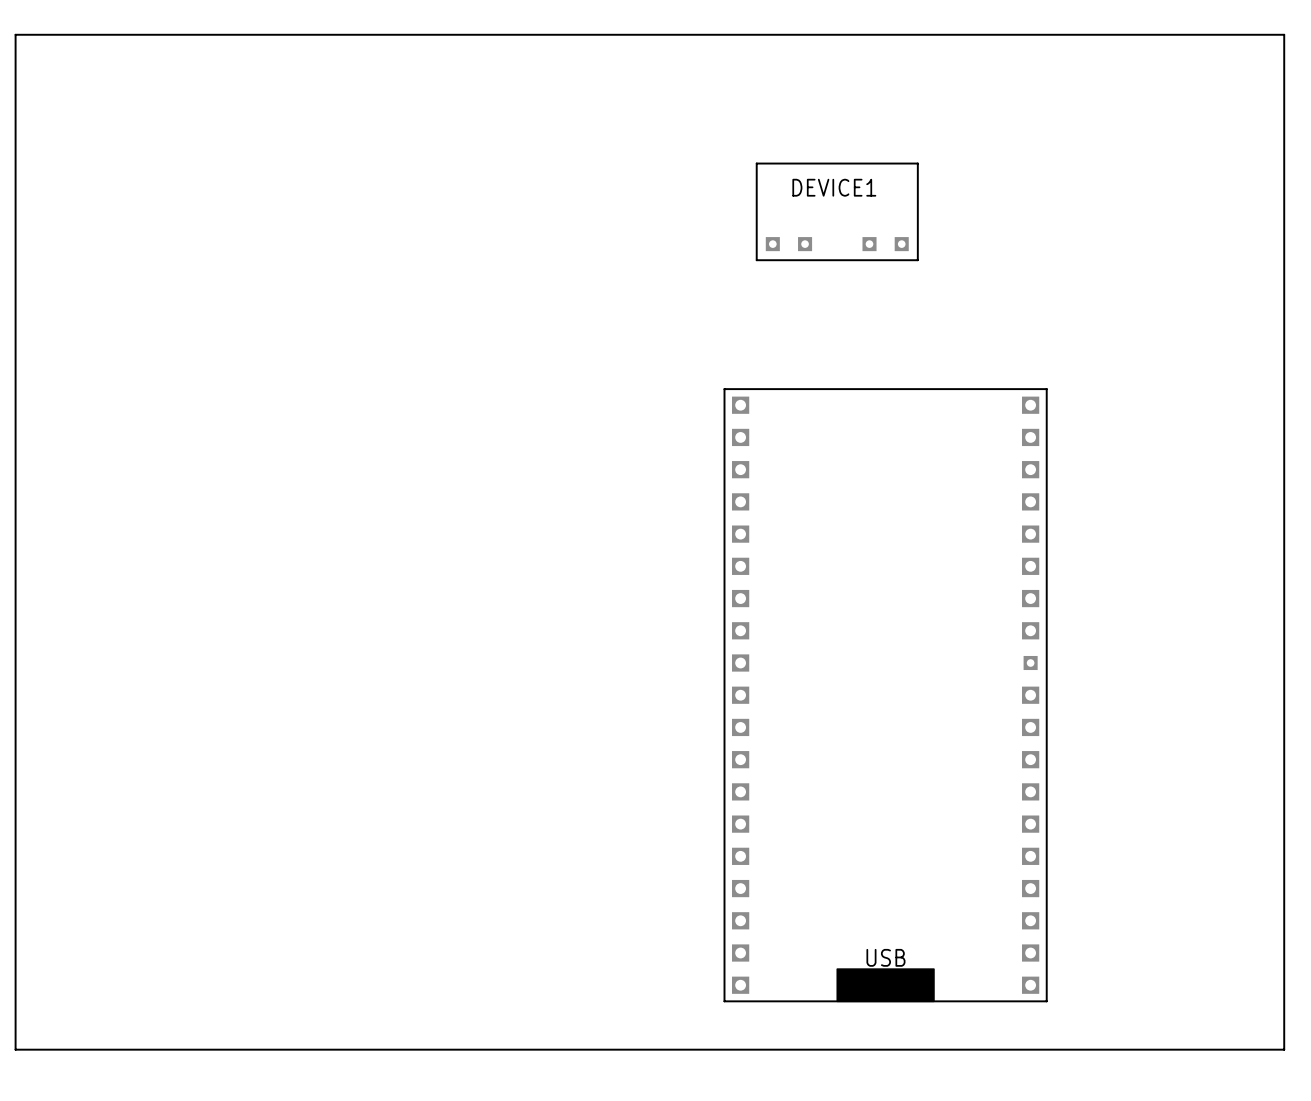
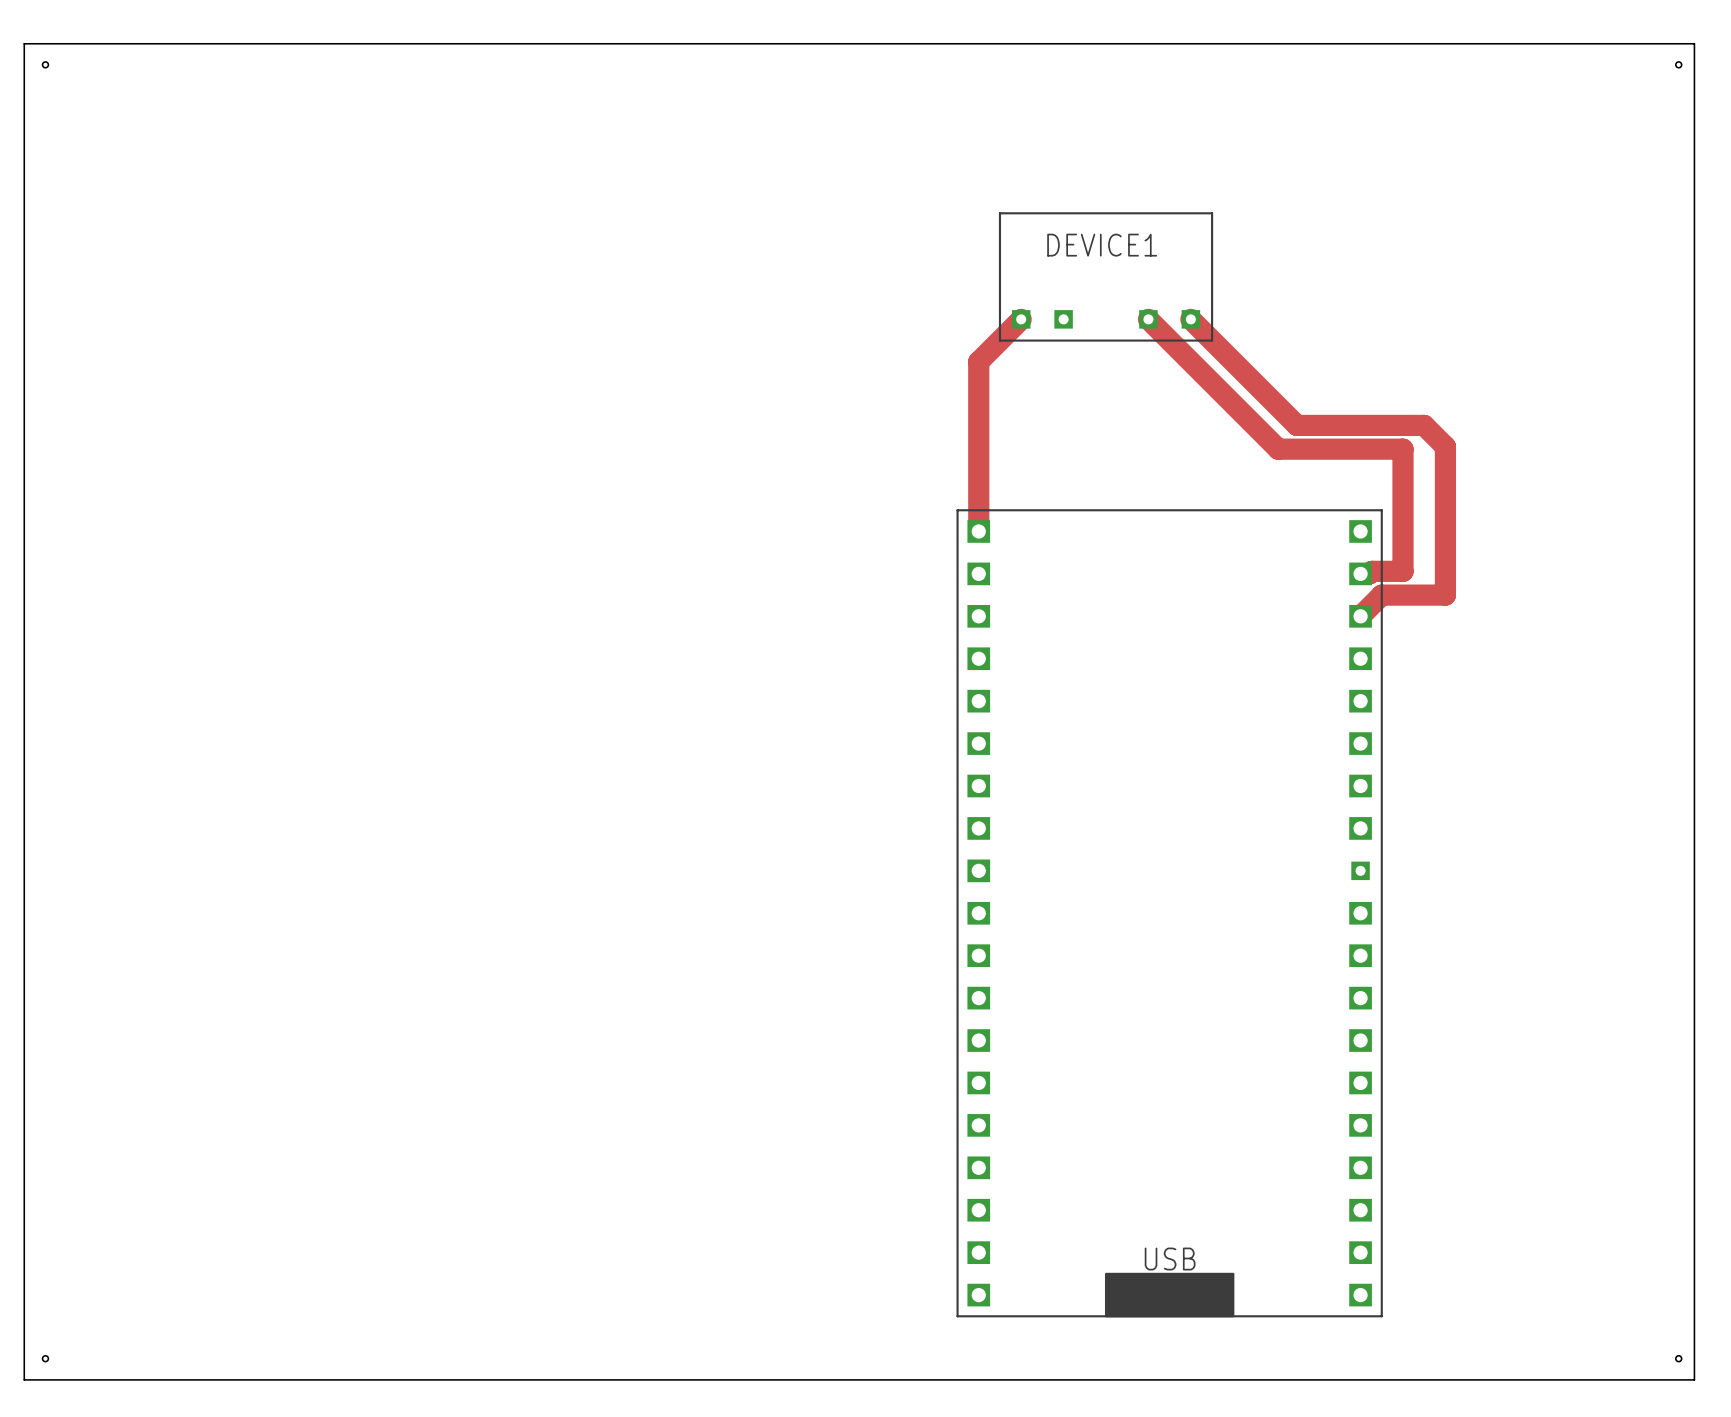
hole: none -> (45, 64)
hole: none -> (1678, 64)
track: none -> (1021, 319) (978, 361) (978, 531)
track: none -> (1148, 319) (1278, 449) (1402, 449) (1402, 571) (1371, 571) (1369, 573) (1360, 573)
track: none -> (1190, 319) (1296, 425) (1424, 425) (1445, 446) (1445, 595) (1381, 595) (1360, 616)
hole: none -> (45, 1358)
hole: none -> (1678, 1358)

